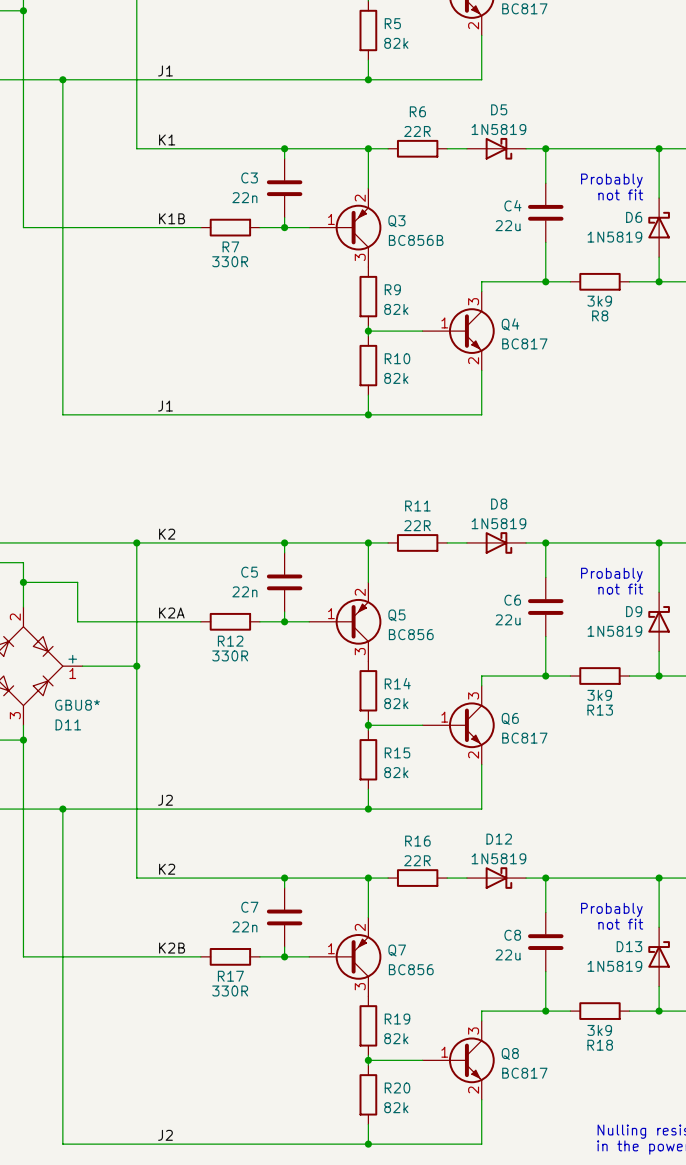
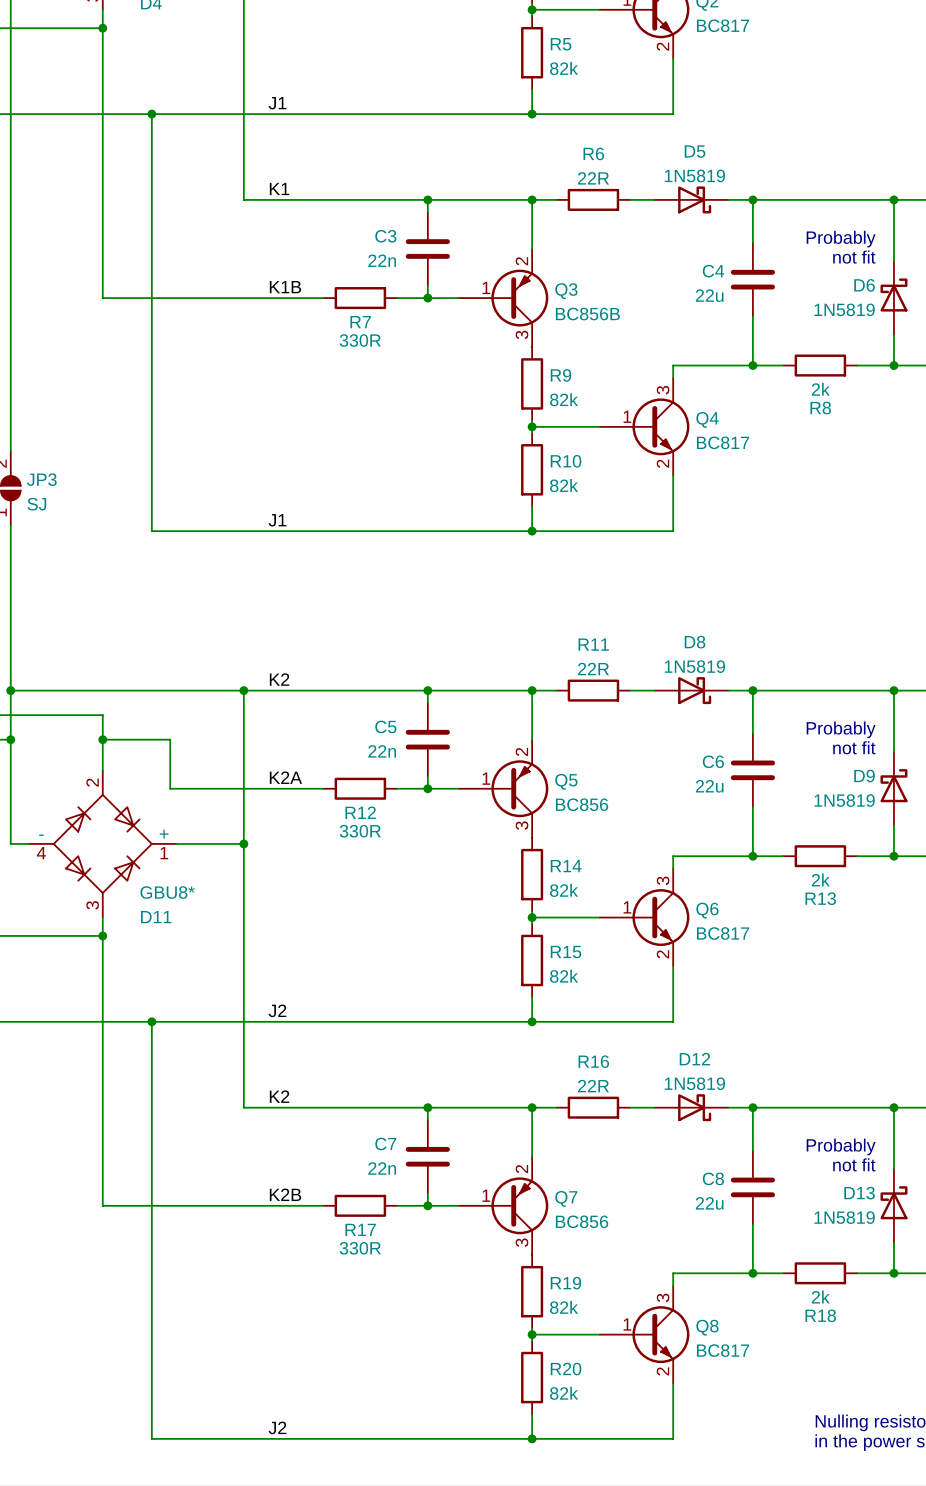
R8 value: 3k9 (599, 301) -> 2k (820, 389)
R13 value: 3k9 (599, 695) -> 2k (820, 879)
R18 value: 3k9 (599, 1030) -> 2k (820, 1297)

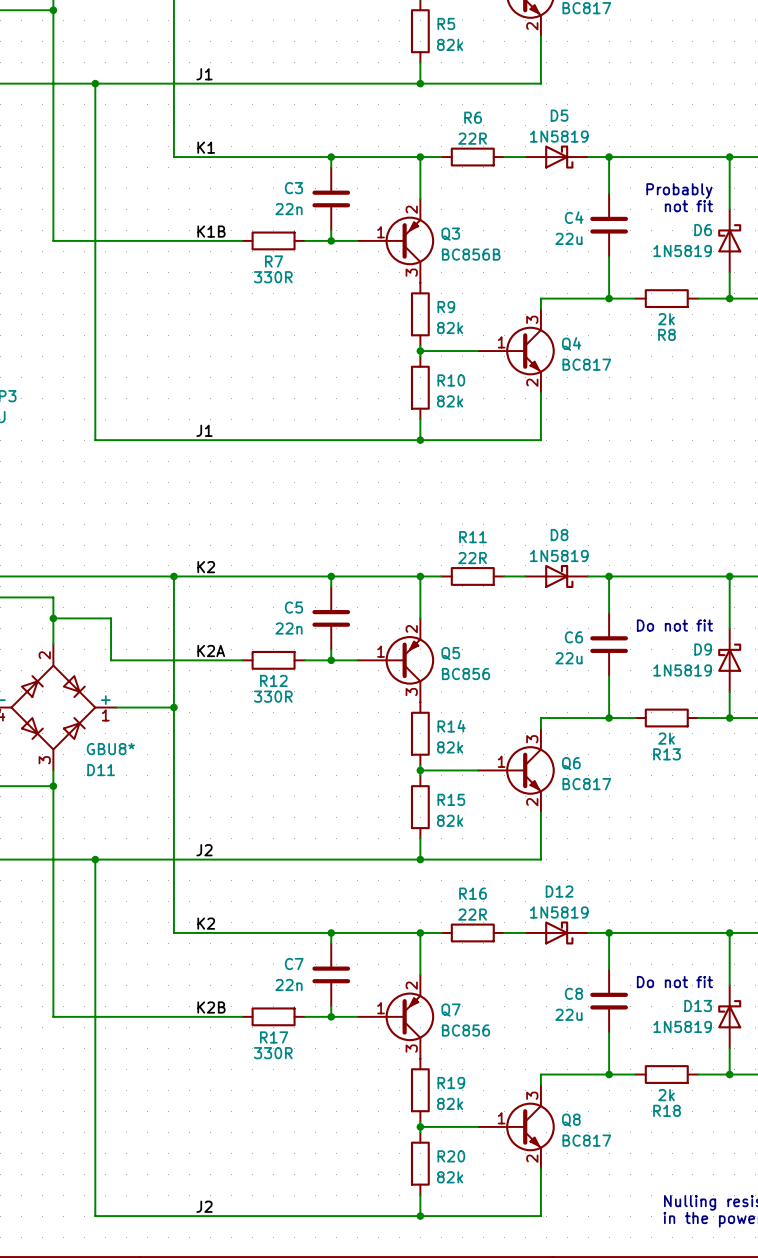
text: Probably (841, 729) -> none
text: not fit (854, 747) -> Do not fit (674, 625)
text: Probably (841, 1146) -> none
text: not fit (854, 1164) -> Do not fit (674, 982)

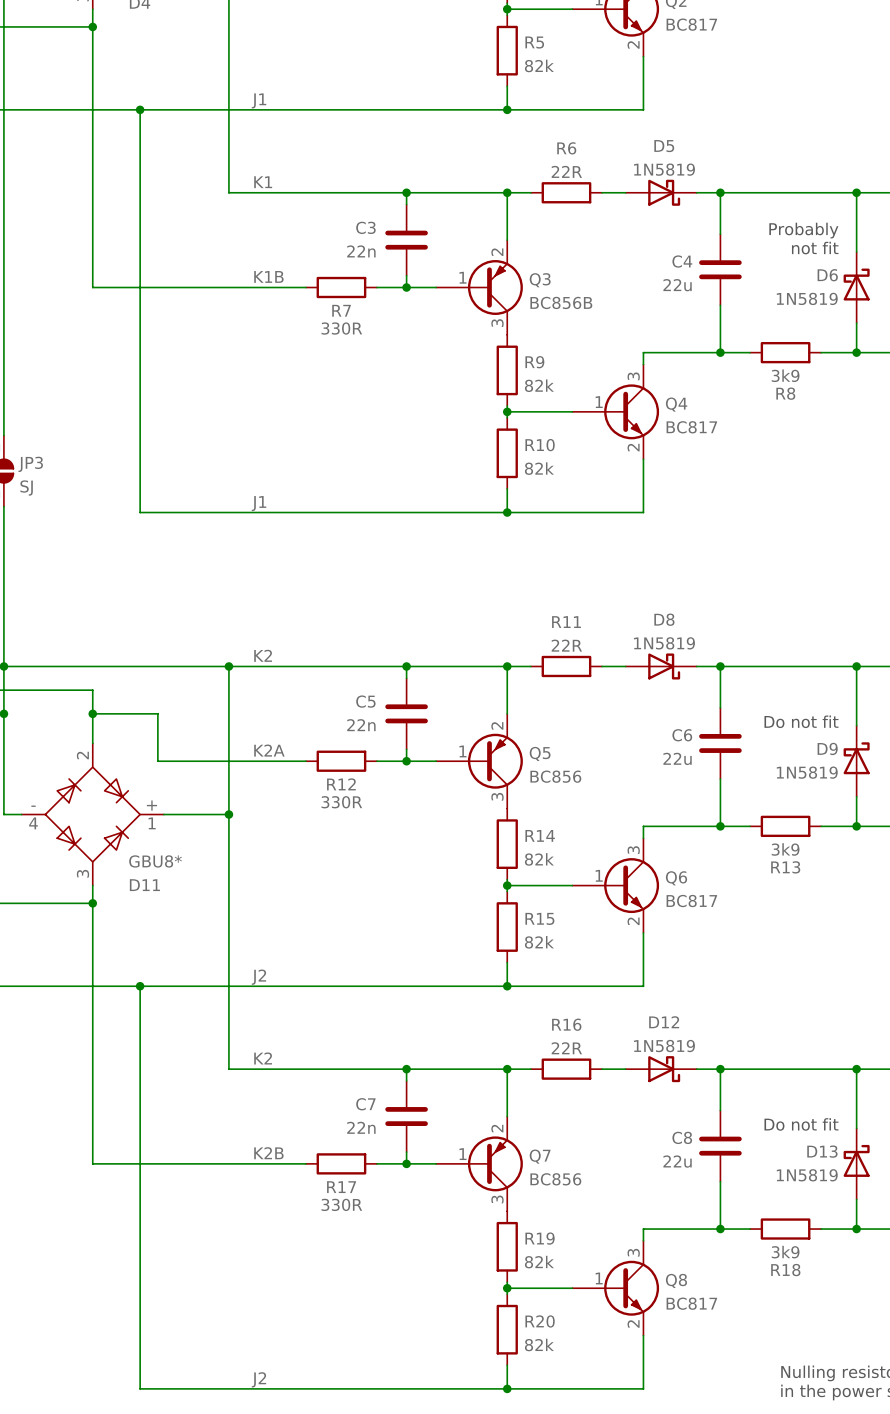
R8 value: 2k (666, 319) -> 3k9 (785, 375)
R13 value: 2k (666, 738) -> 3k9 (785, 849)
R18 value: 2k (666, 1095) -> 3k9 (785, 1252)

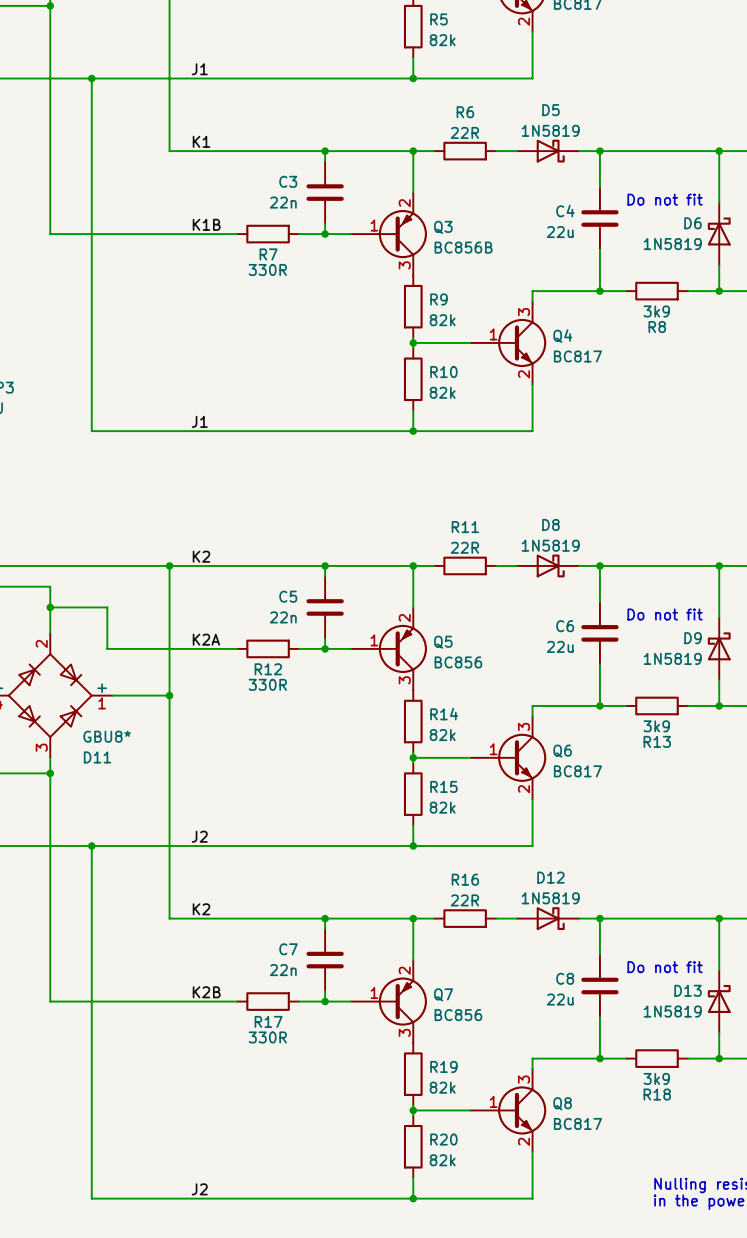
text: Probably (803, 230) -> none
text: not fit (815, 248) -> Do not fit (665, 199)

